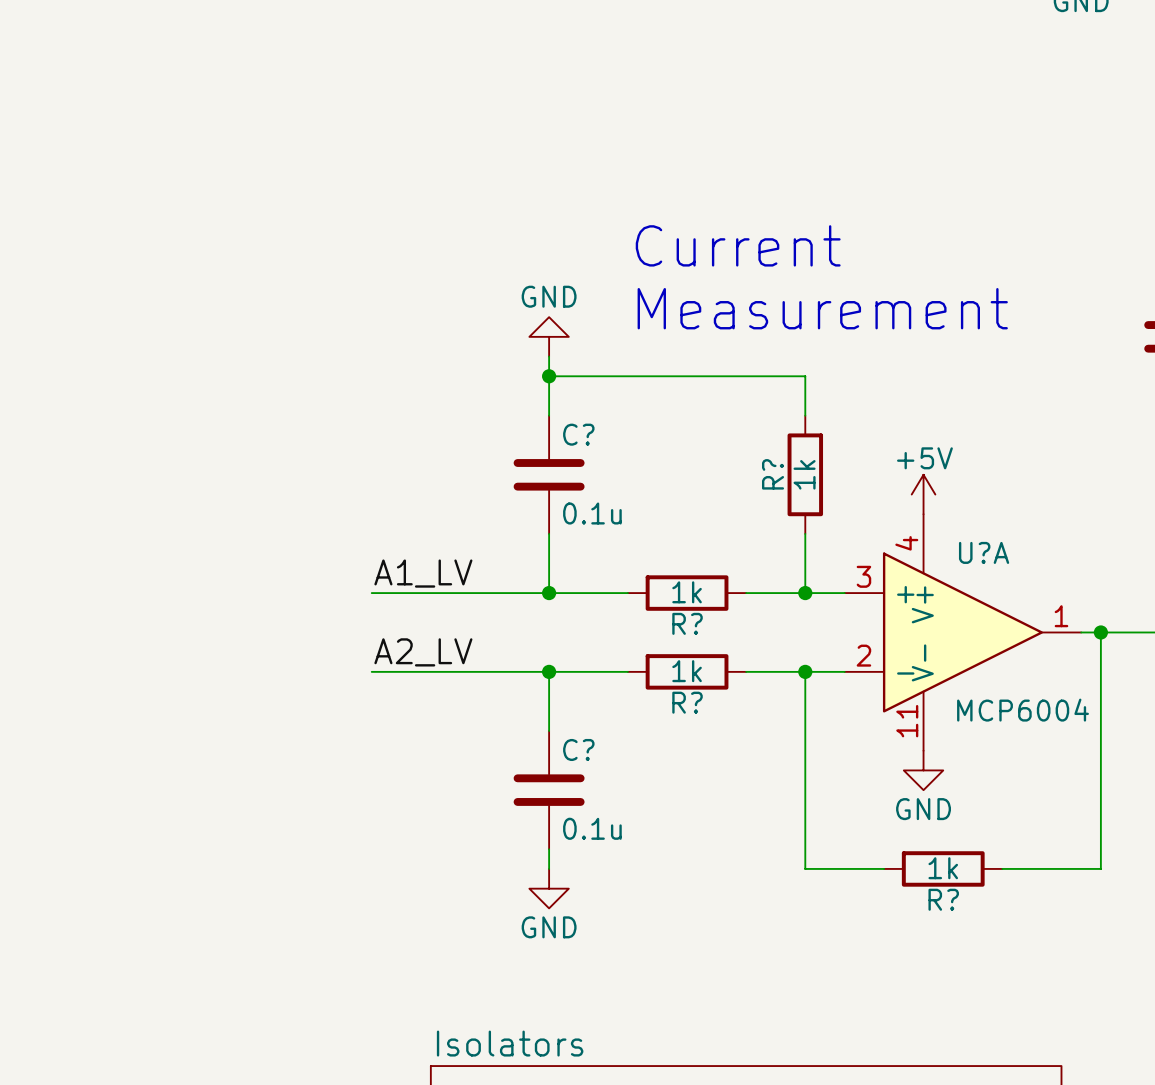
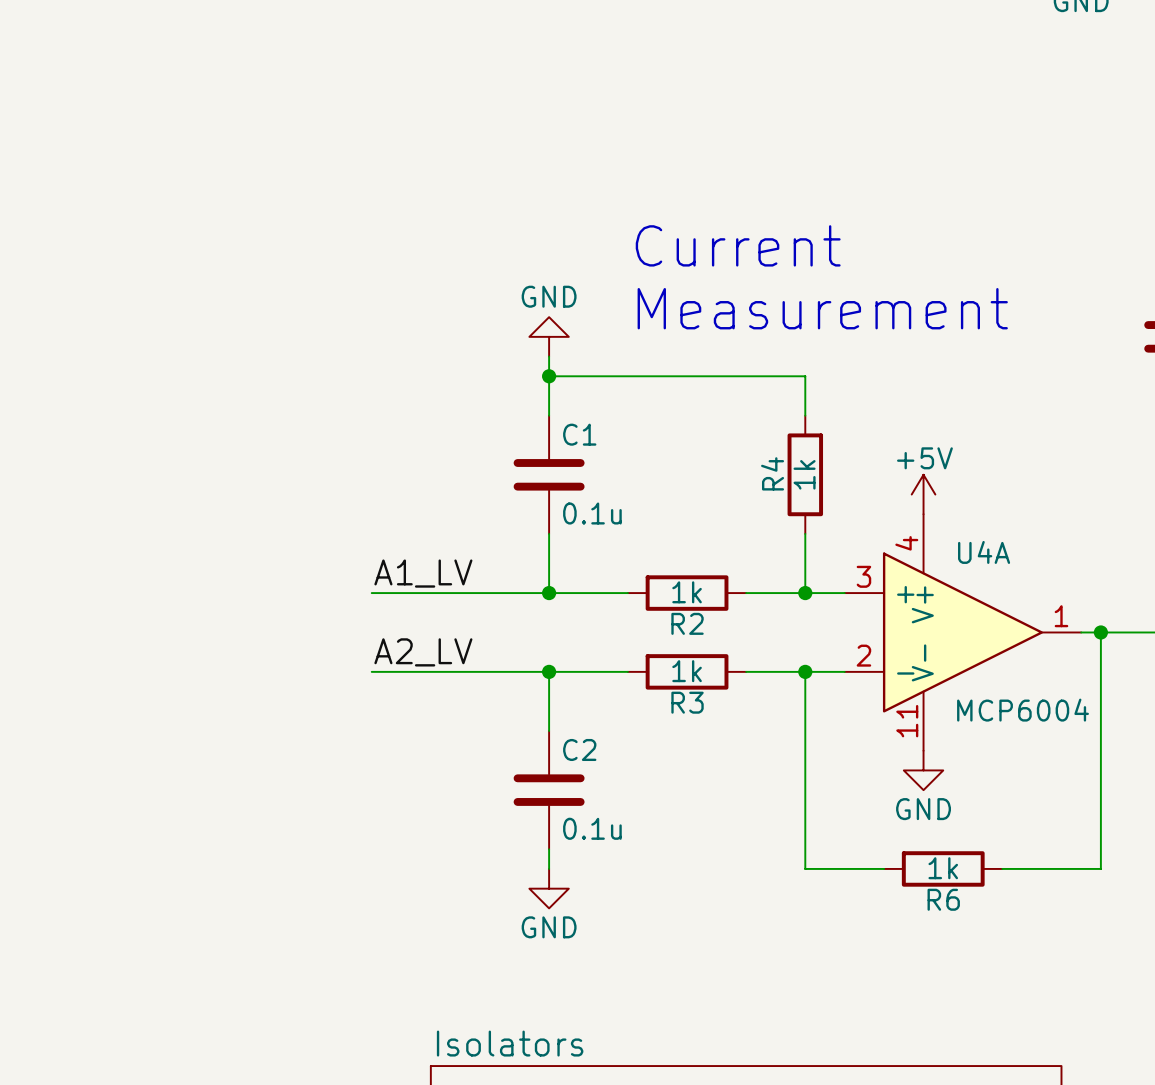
C? name: C? (578, 434) -> C1 (579, 434)
R? name: R? (773, 474) -> R4 (772, 473)
U?A name: U?A (984, 552) -> U4A (984, 552)
R? name: R? (687, 623) -> R2 (687, 623)
R? name: R? (687, 702) -> R3 (687, 702)
C? name: C? (578, 749) -> C2 (579, 749)
R? name: R? (943, 899) -> R6 (943, 899)

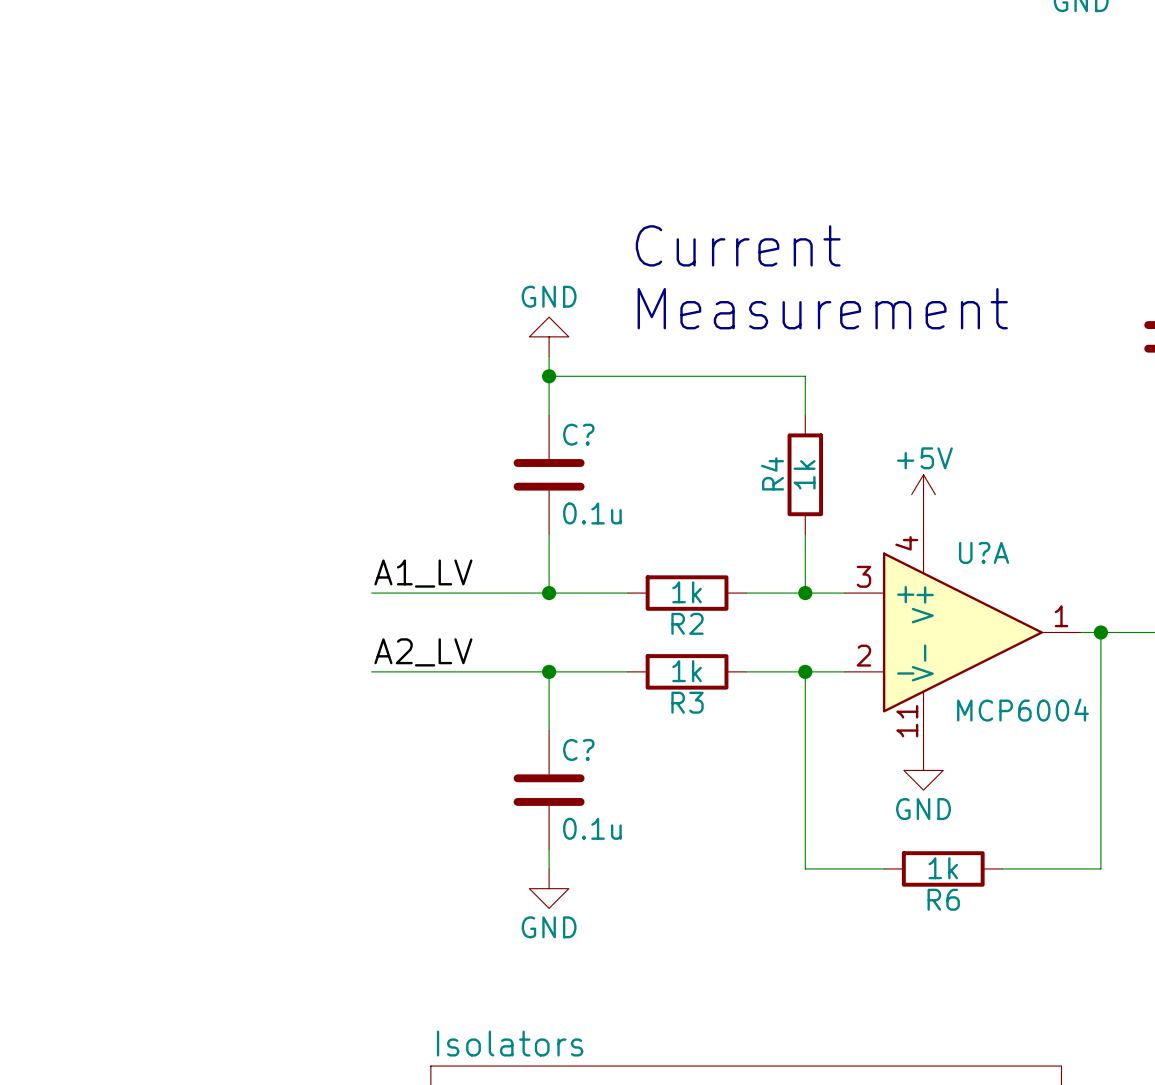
C1 name: C1 (579, 434) -> C? (578, 434)
U4A name: U4A (984, 552) -> U?A (984, 552)
C2 name: C2 (579, 749) -> C? (578, 749)

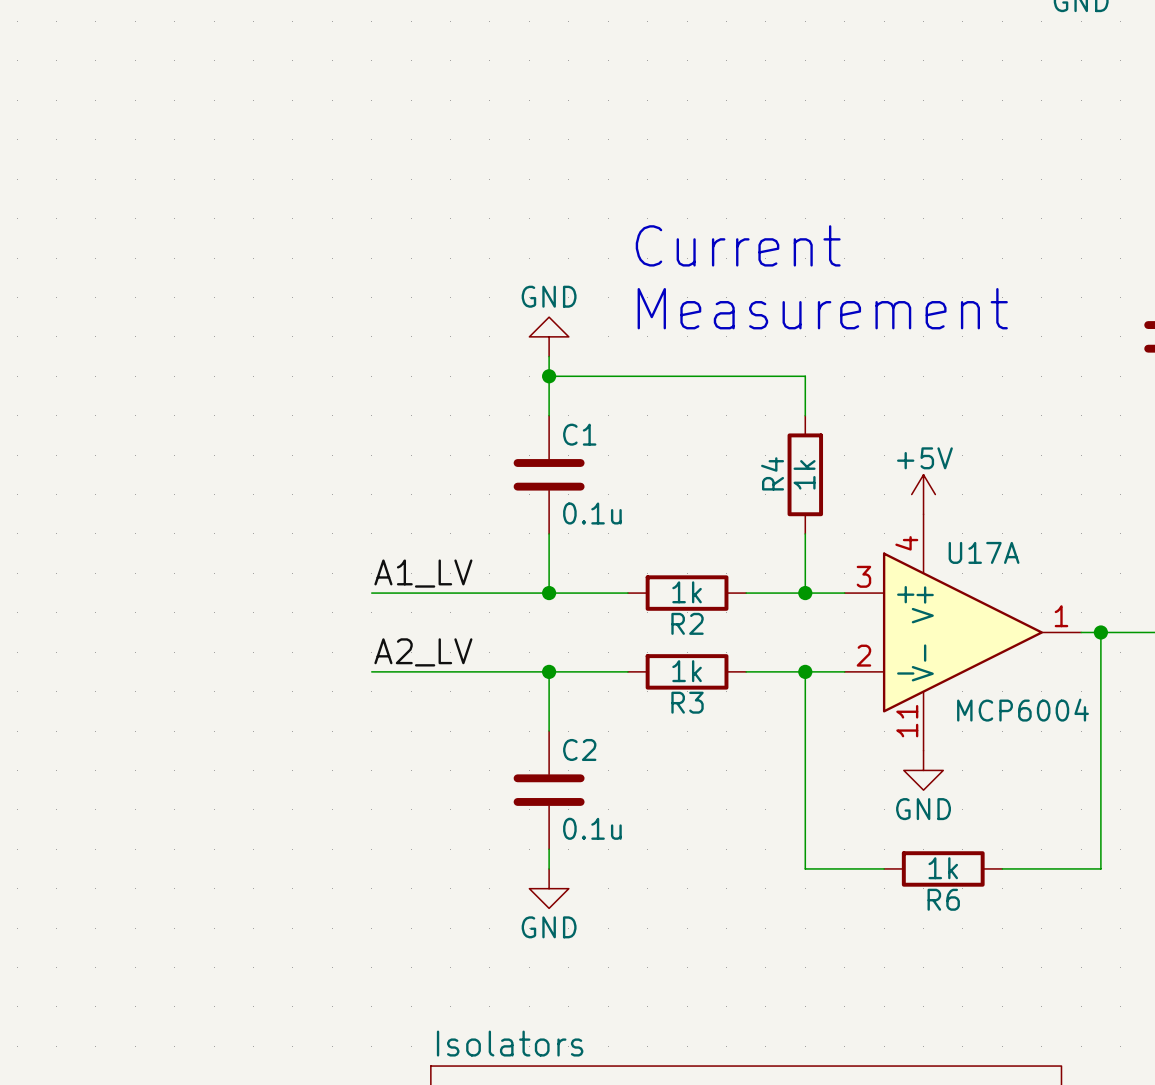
C? name: C? (578, 434) -> C1 (579, 434)
U?A name: U?A (984, 552) -> U17A (984, 552)
C? name: C? (578, 749) -> C2 (579, 749)

